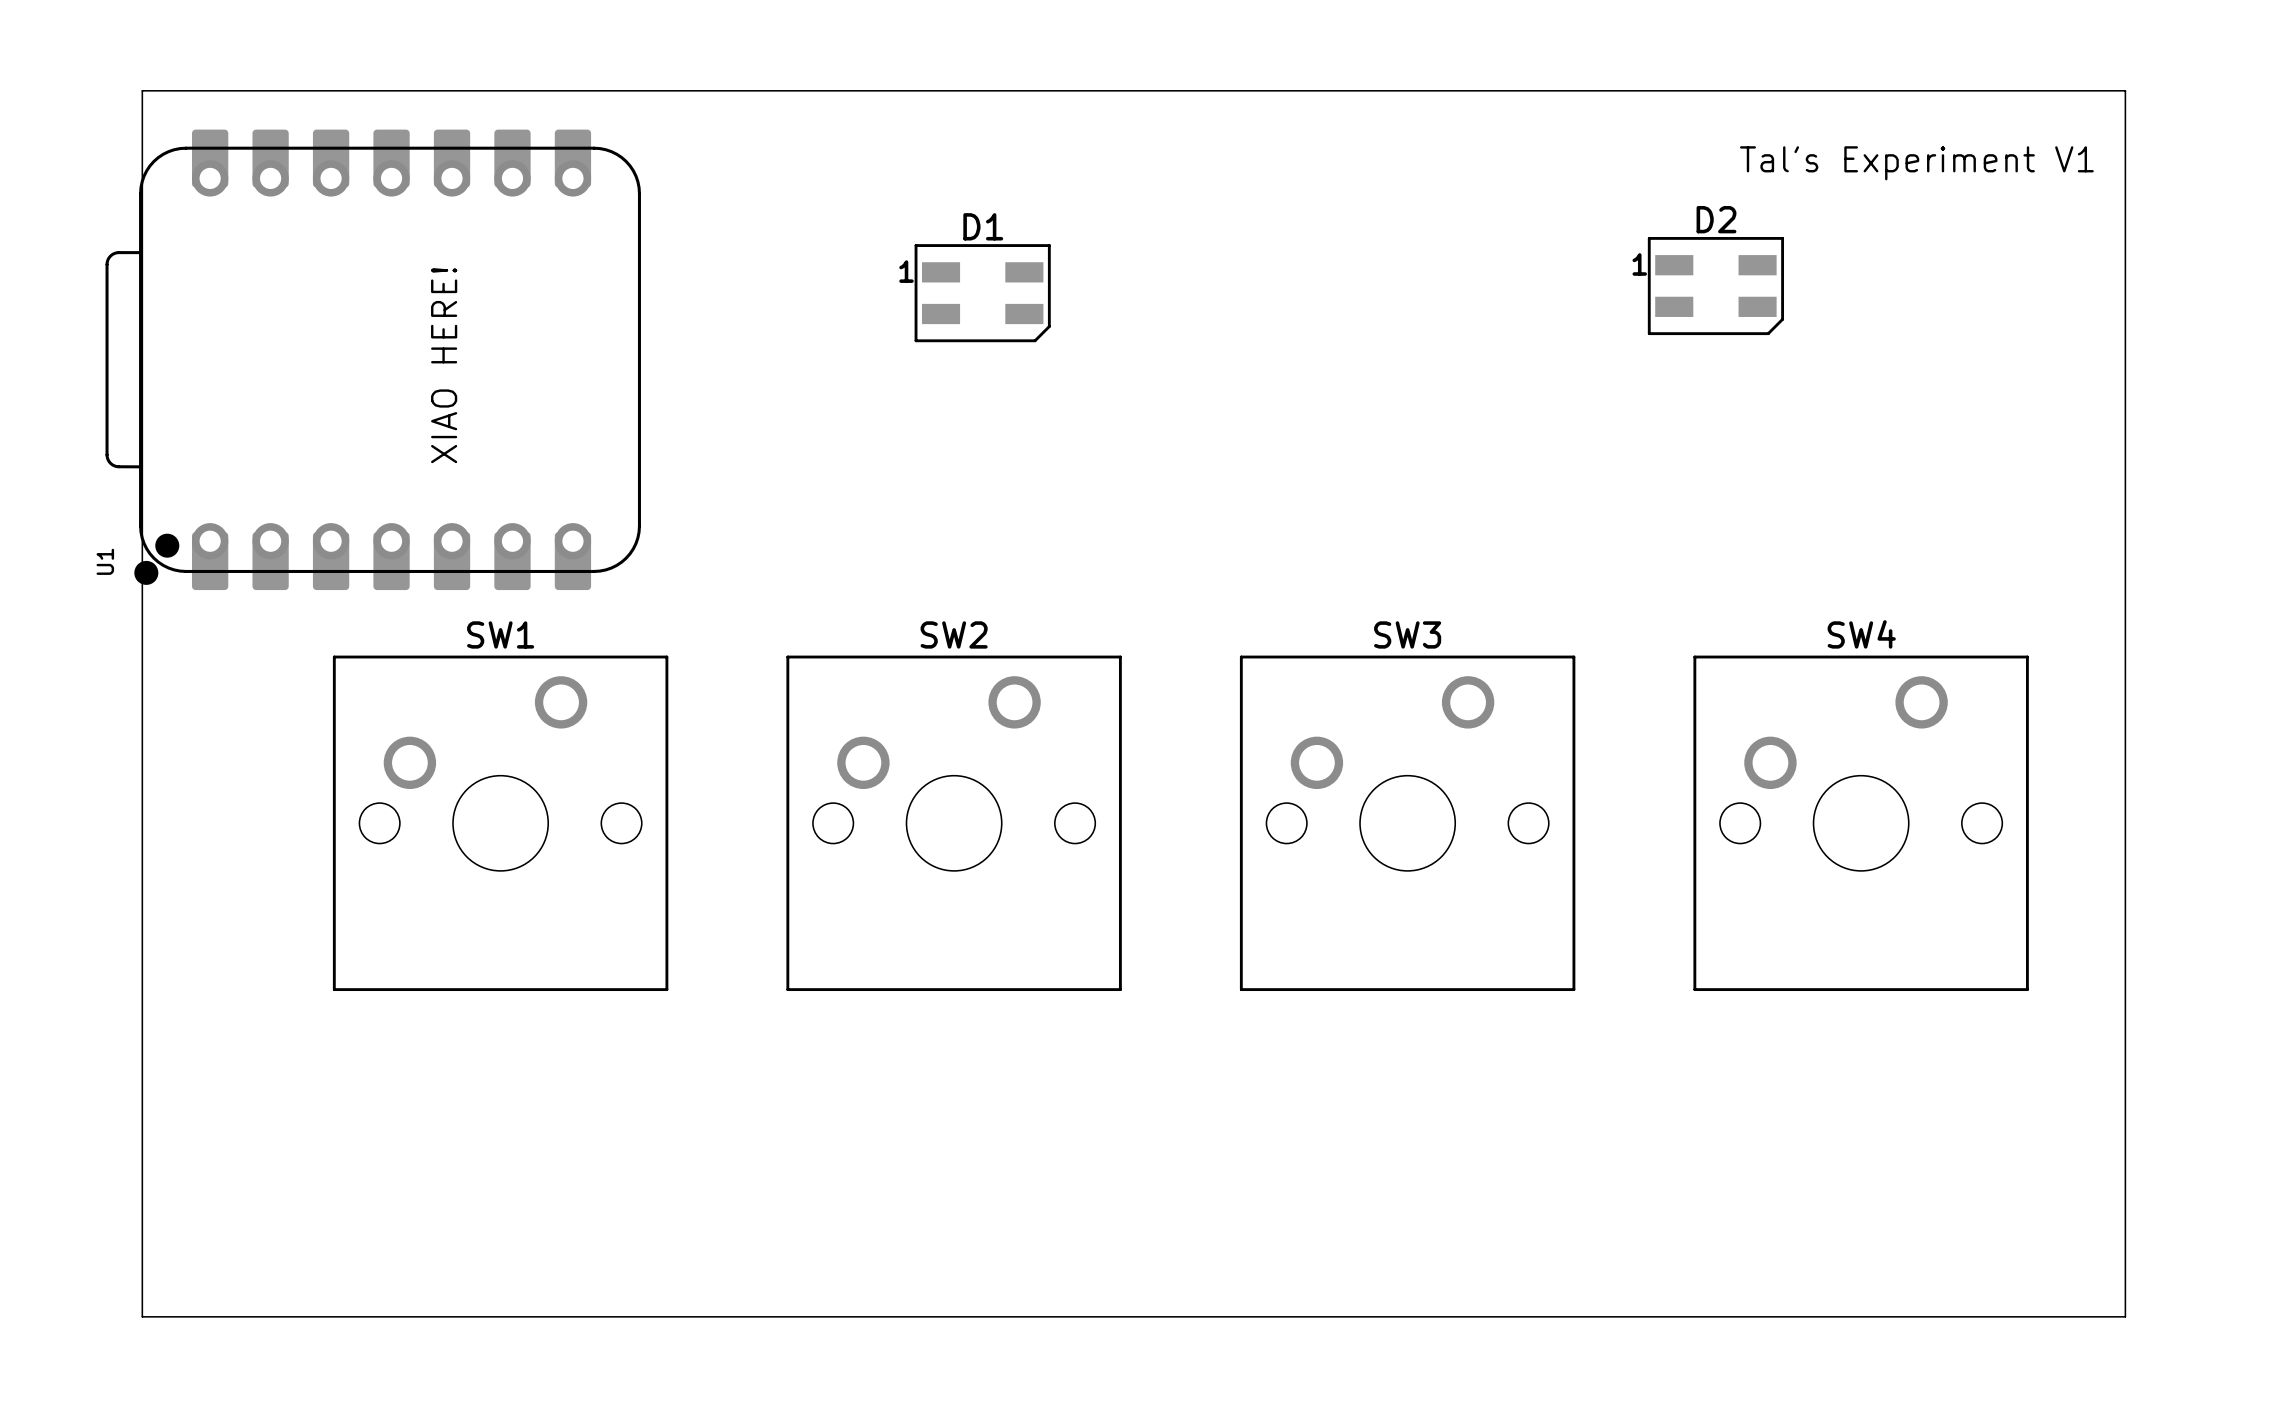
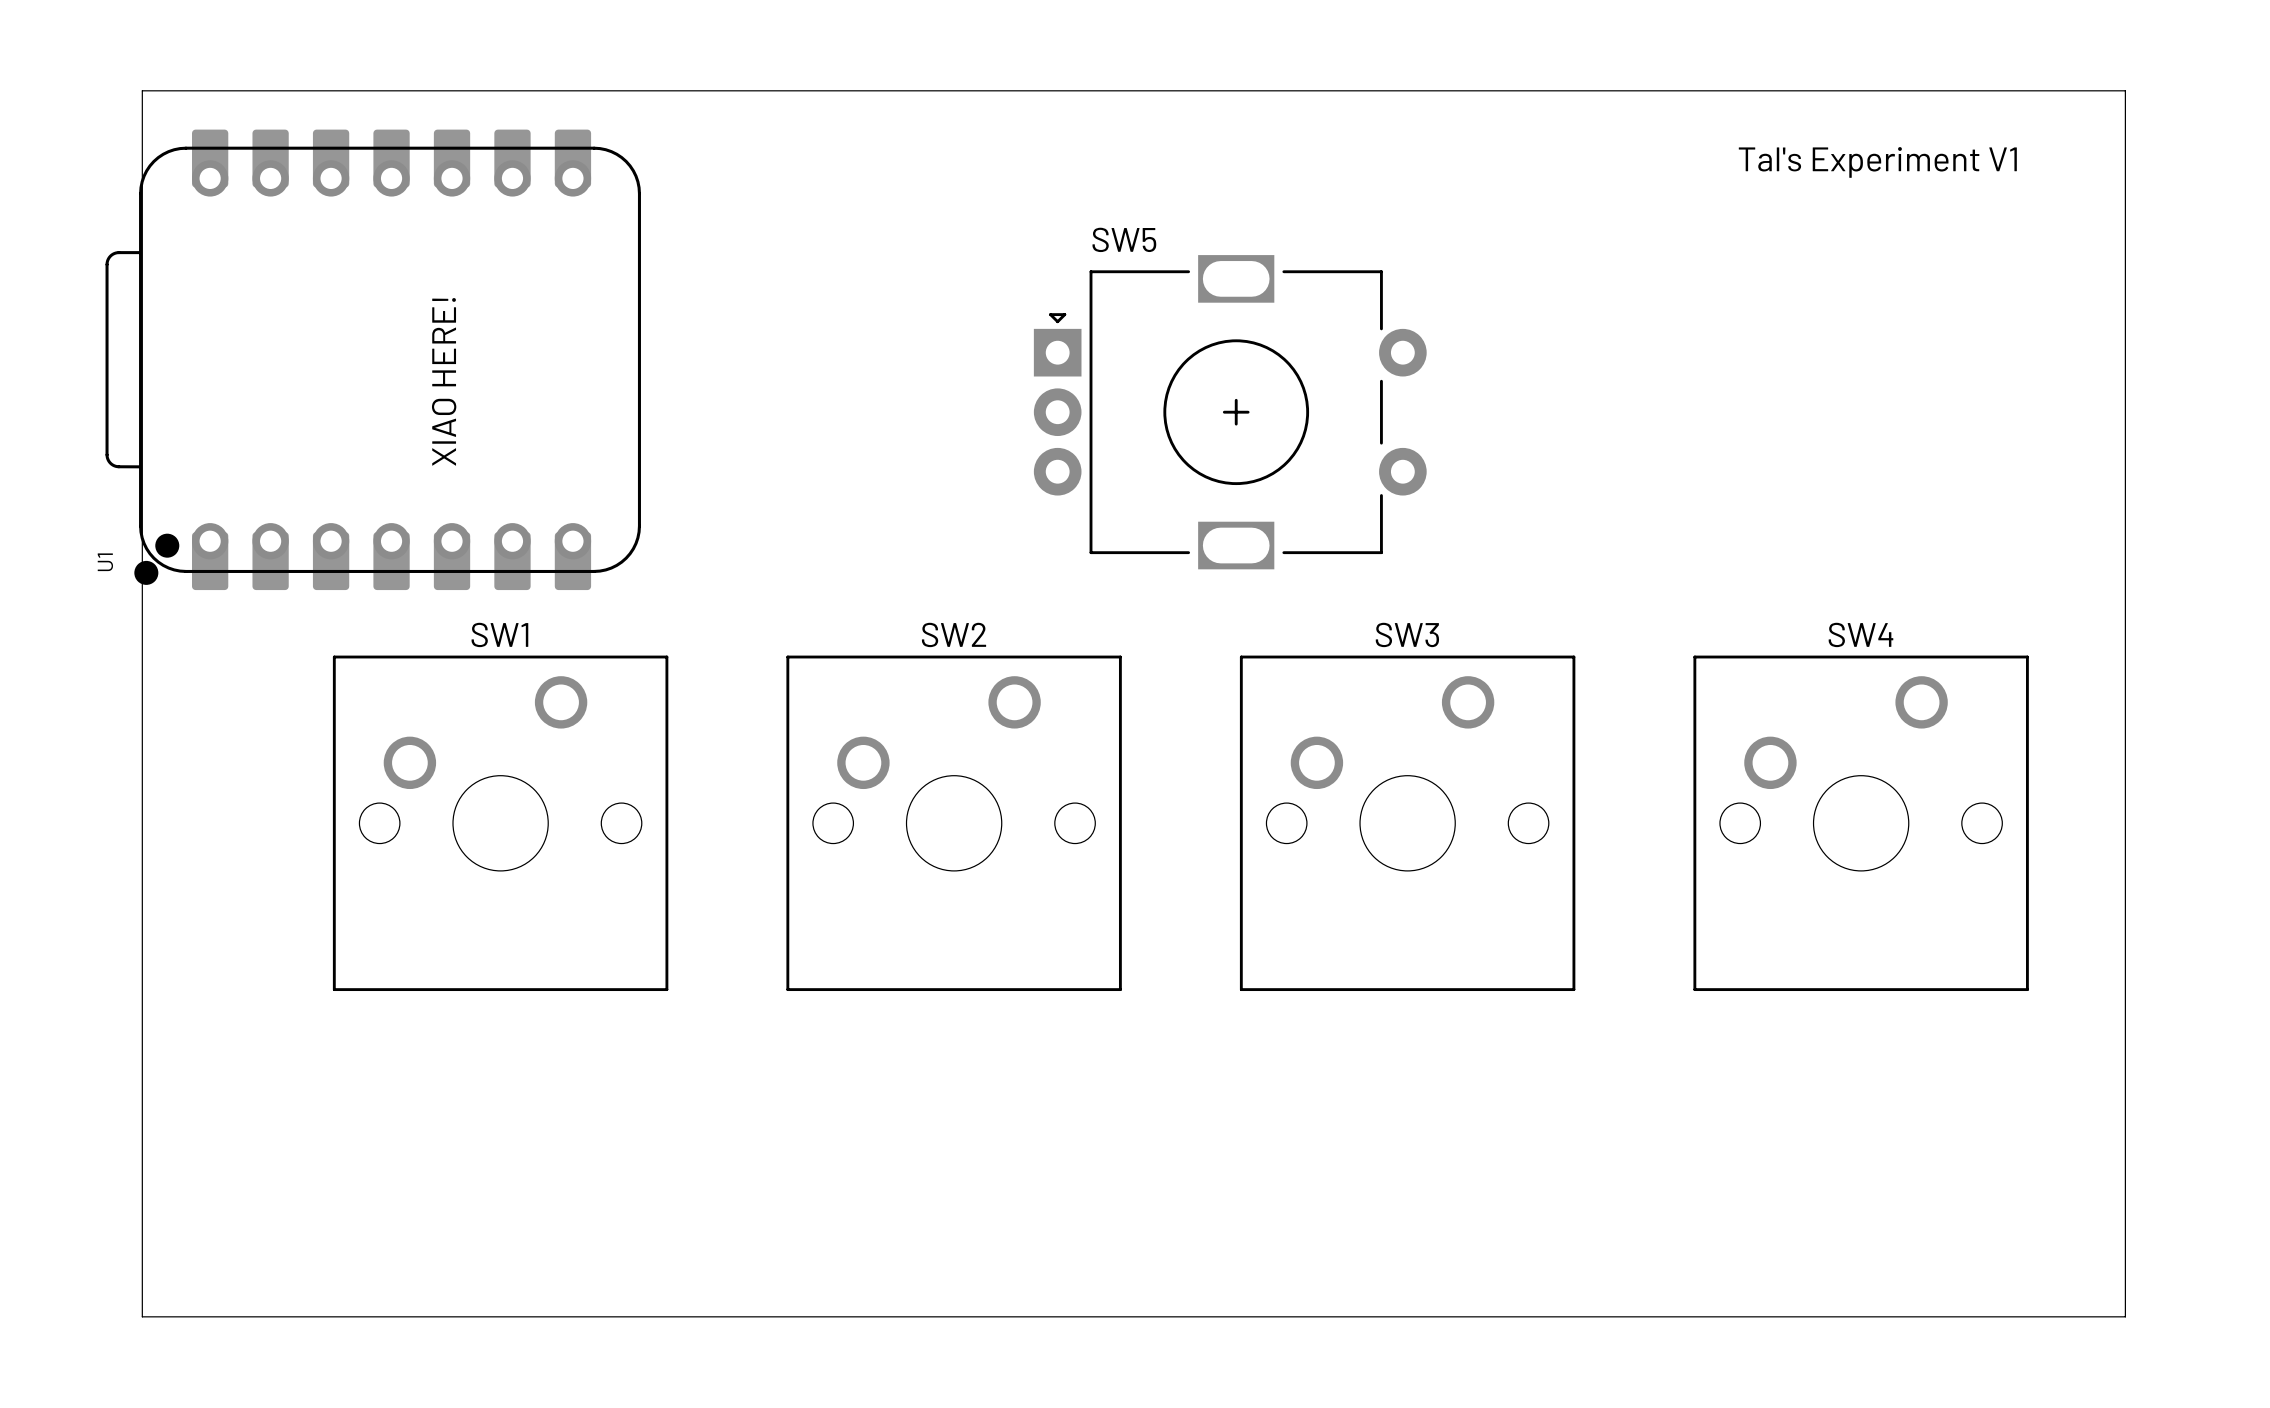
D2: (1715, 286) -> none
D1: (982, 293) -> none
SW5: none -> (1230, 412)

